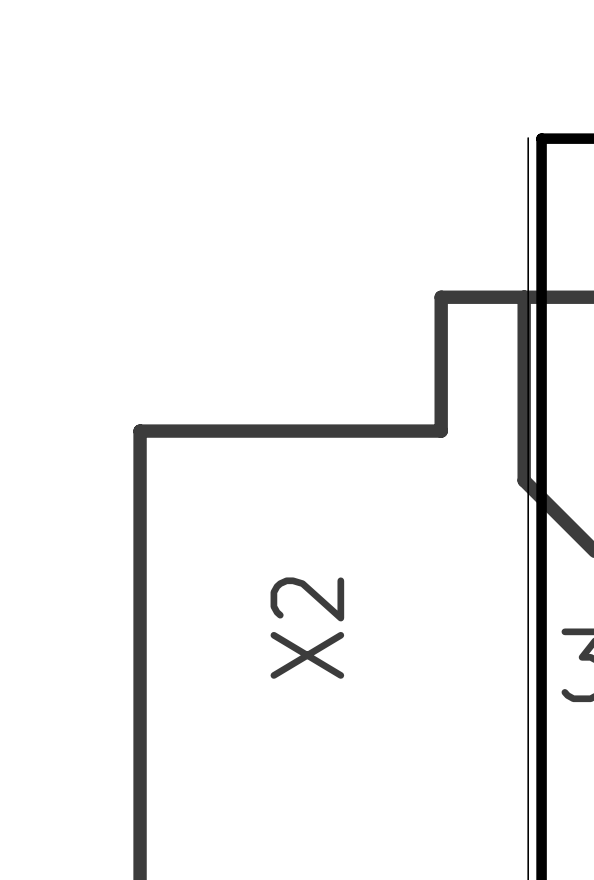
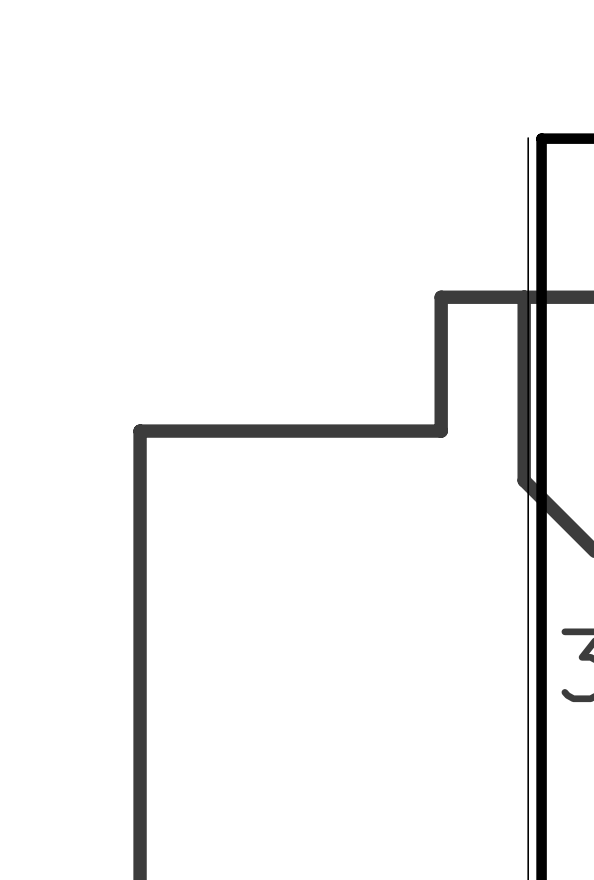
X2 name: X2 (307, 628) -> none

